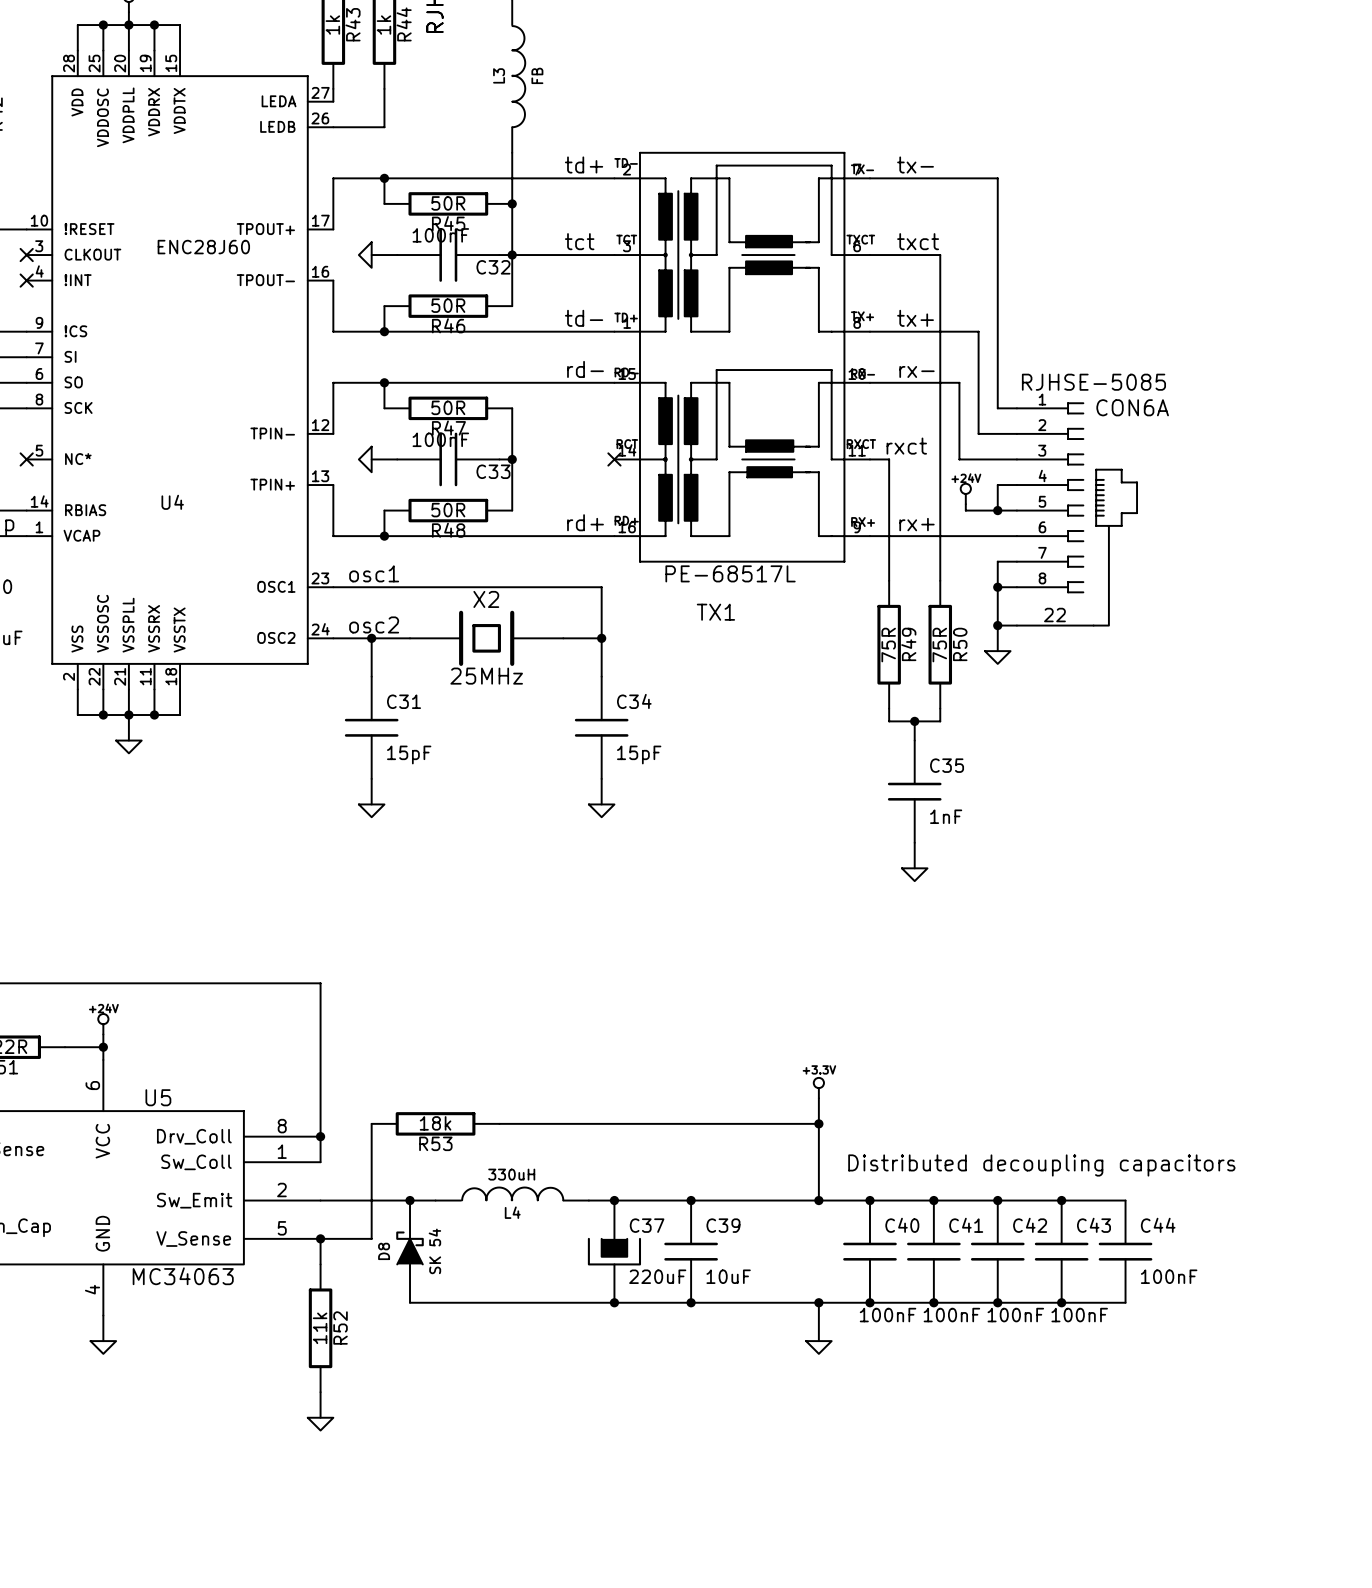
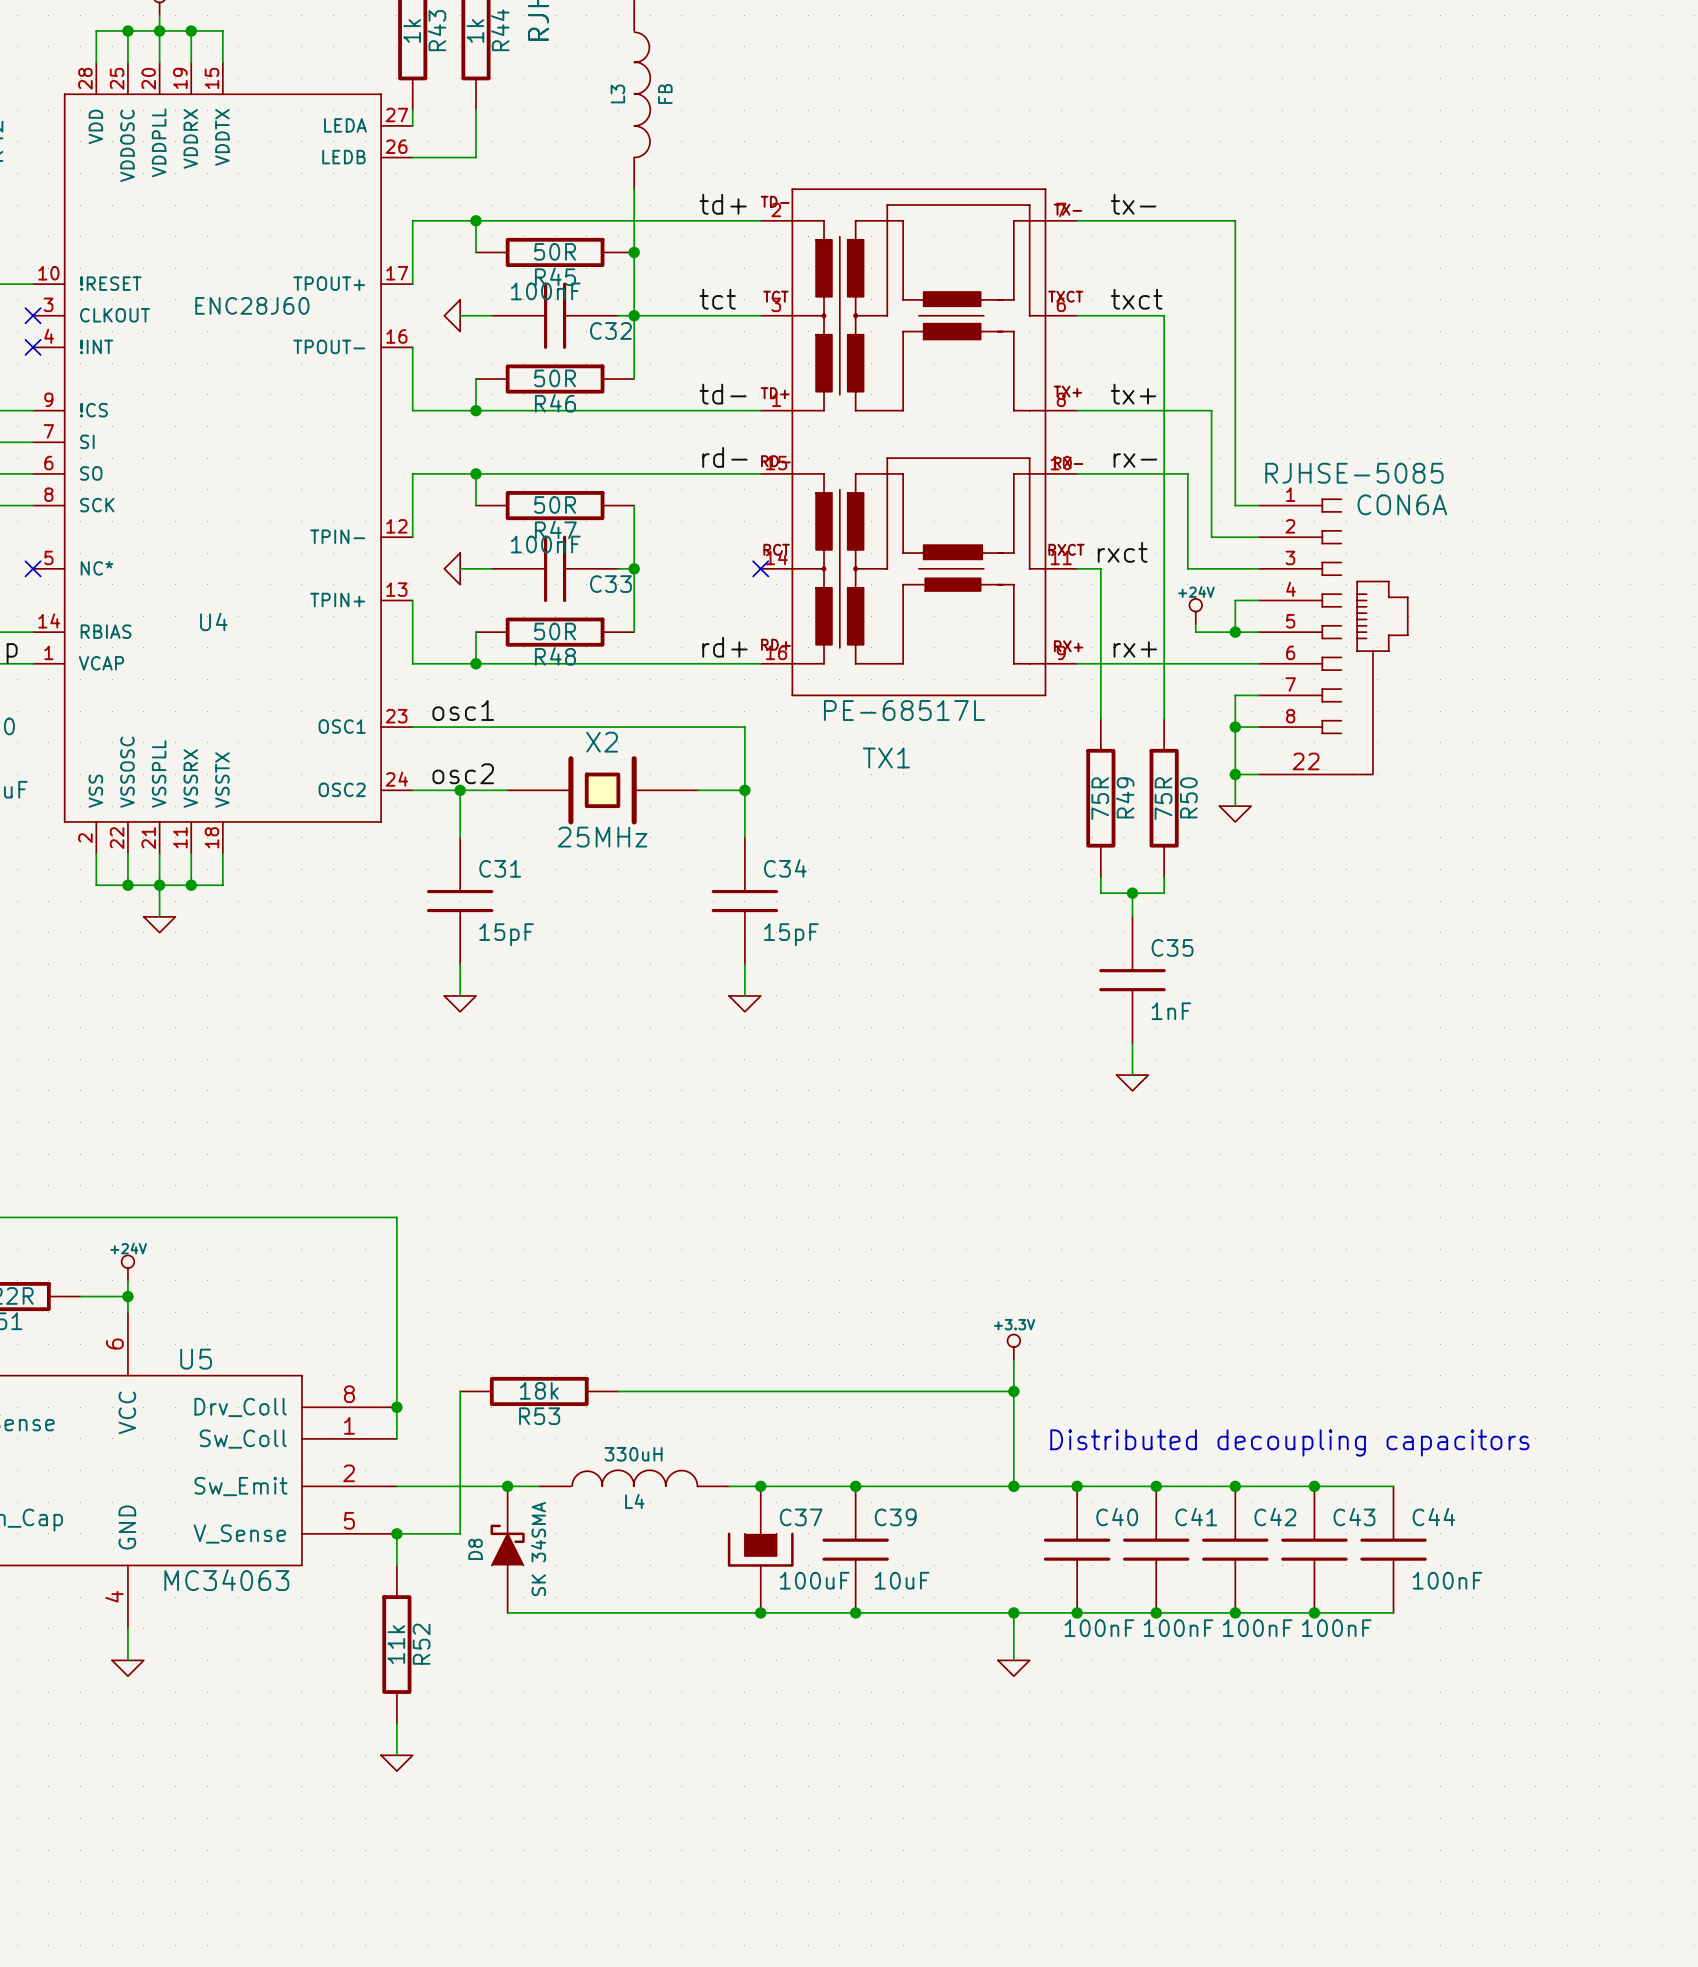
D8 value: SK 54 (434, 1251) -> SK 34SMA (538, 1549)
C37 value: 220uF (657, 1276) -> 100uF (814, 1580)

